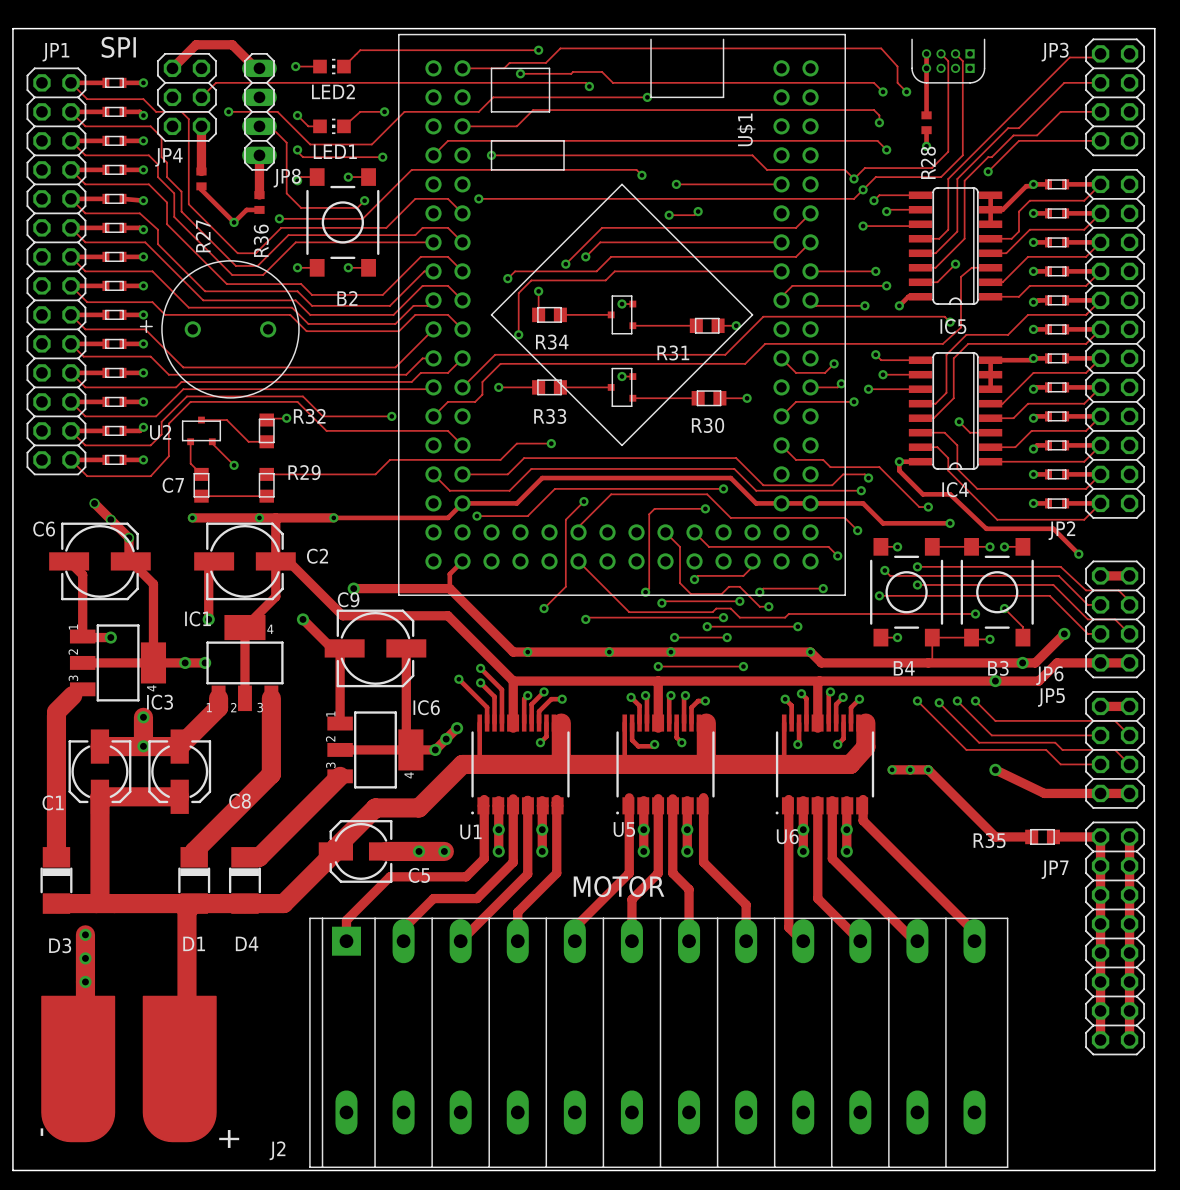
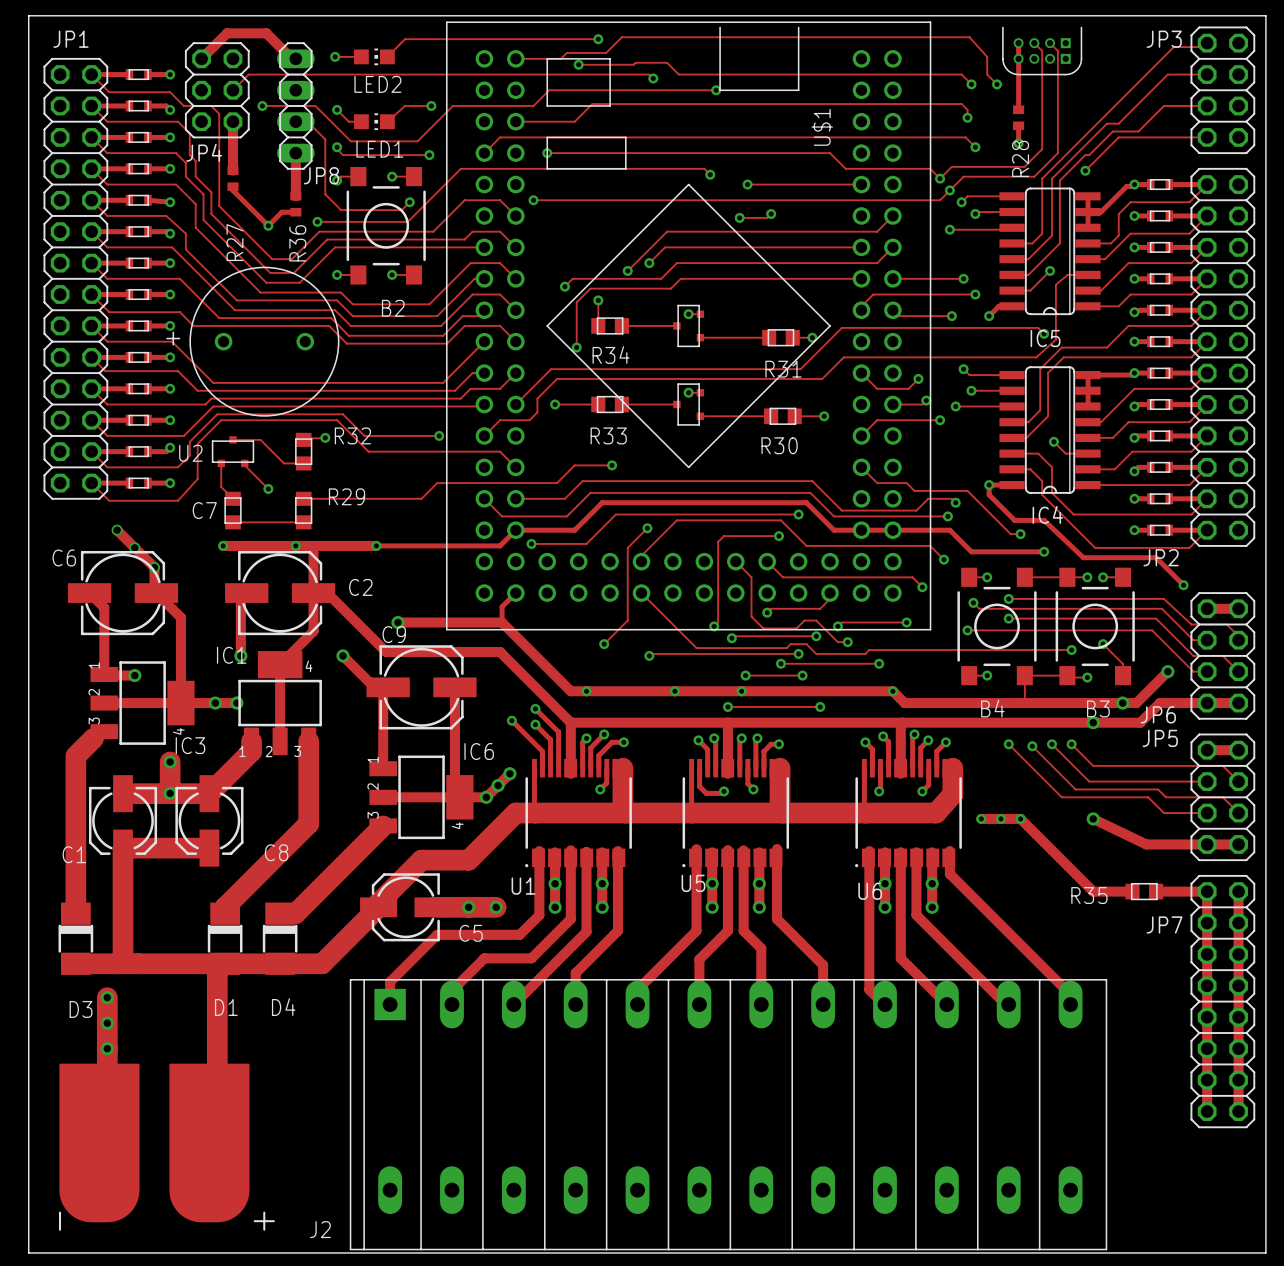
text: SPI (118, 47) -> none
R31 name position: R31 (673, 352) -> R31 (783, 369)
text: MOTOR (619, 886) -> none

